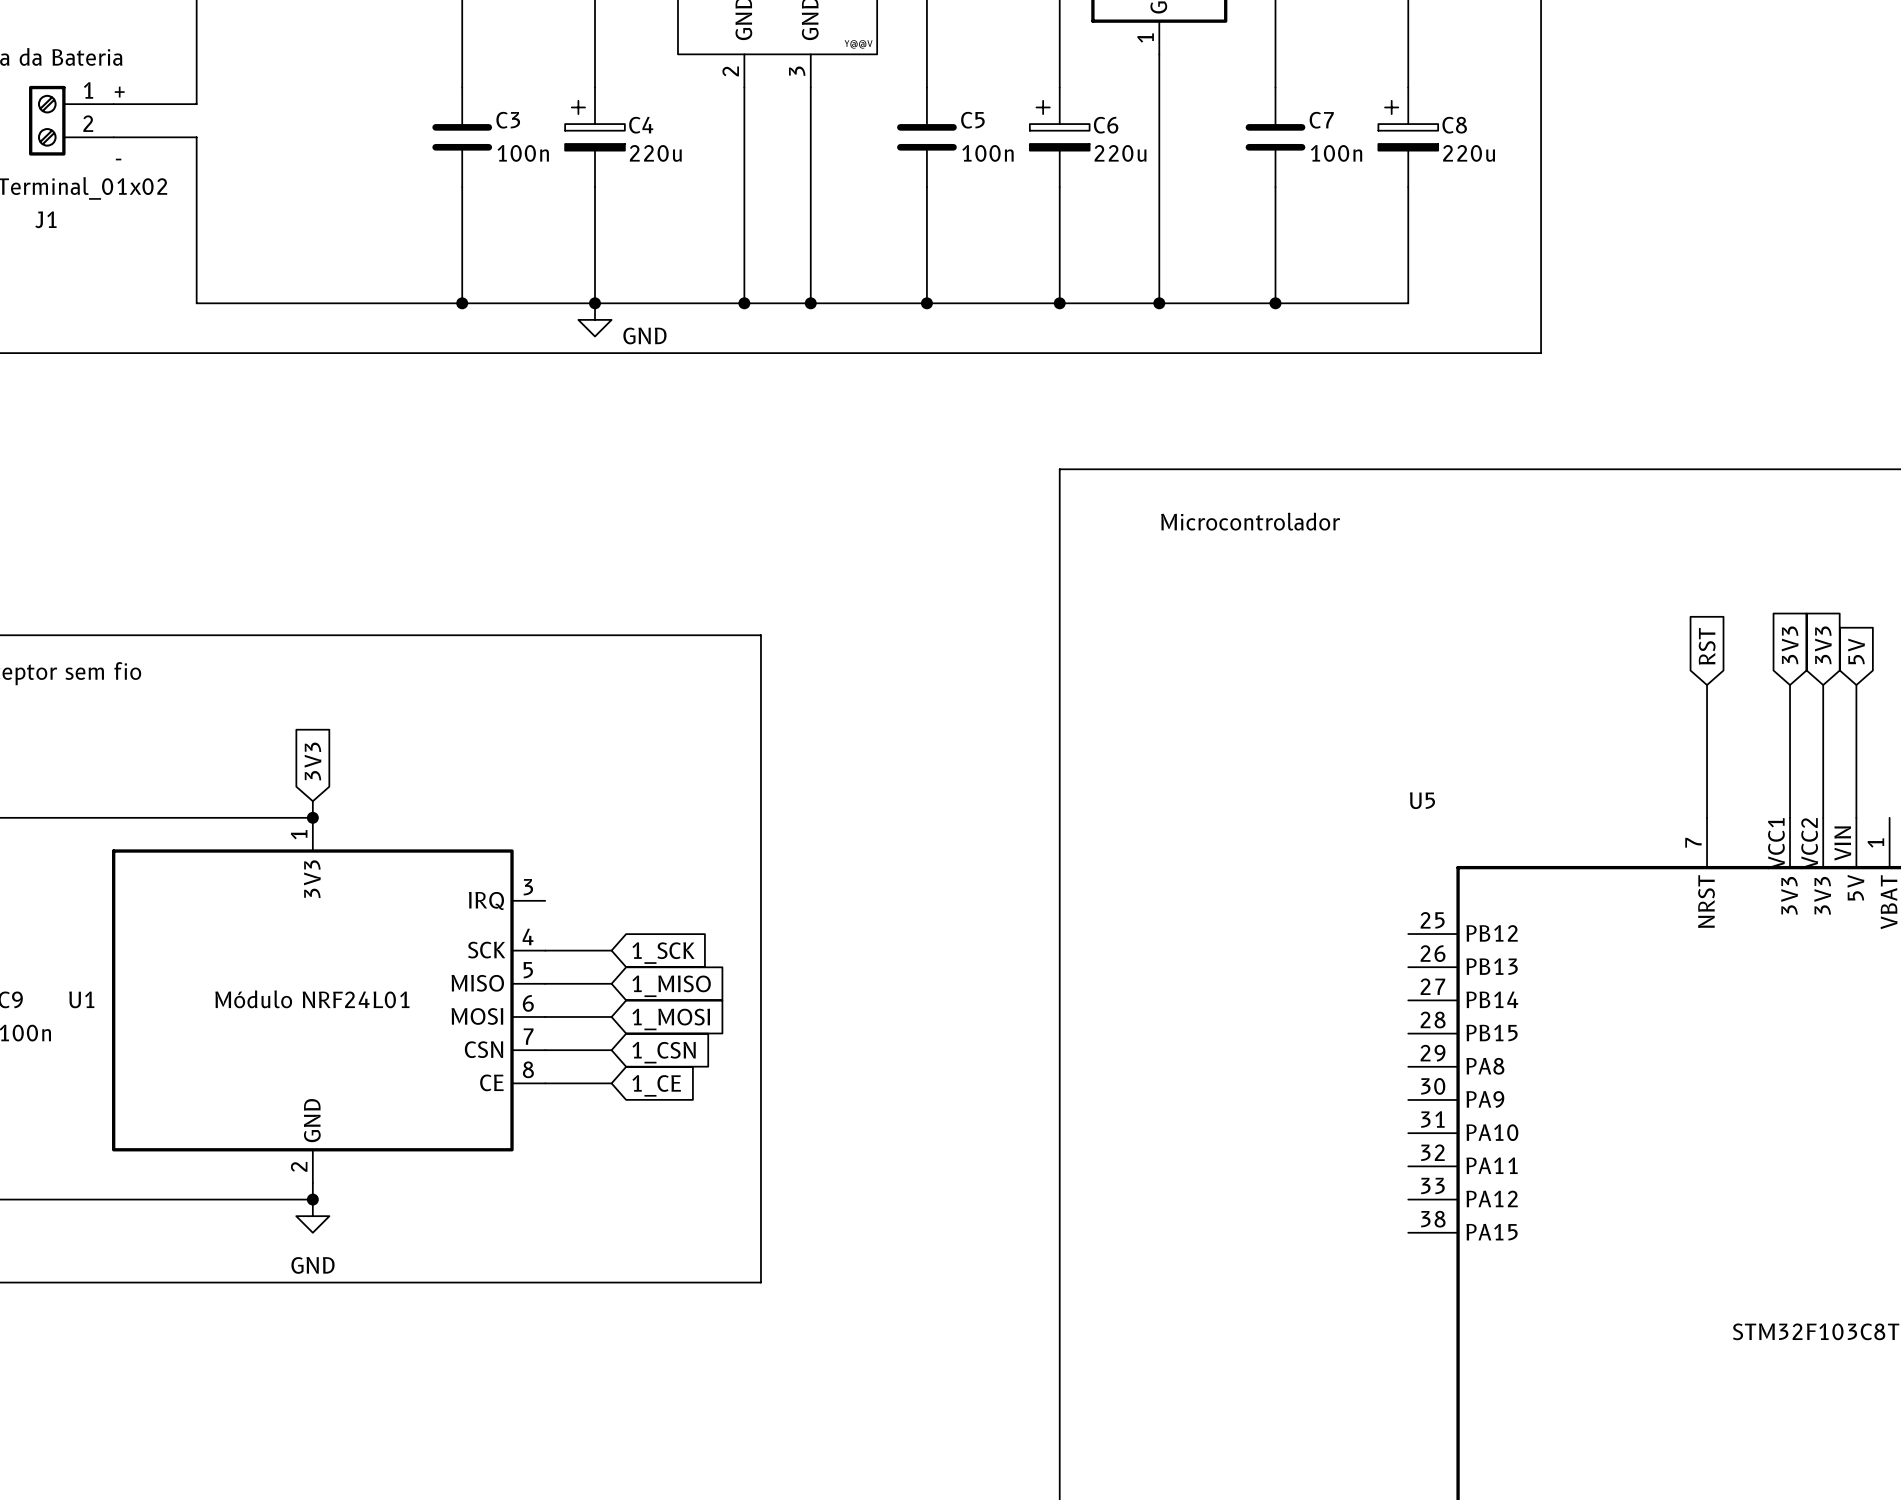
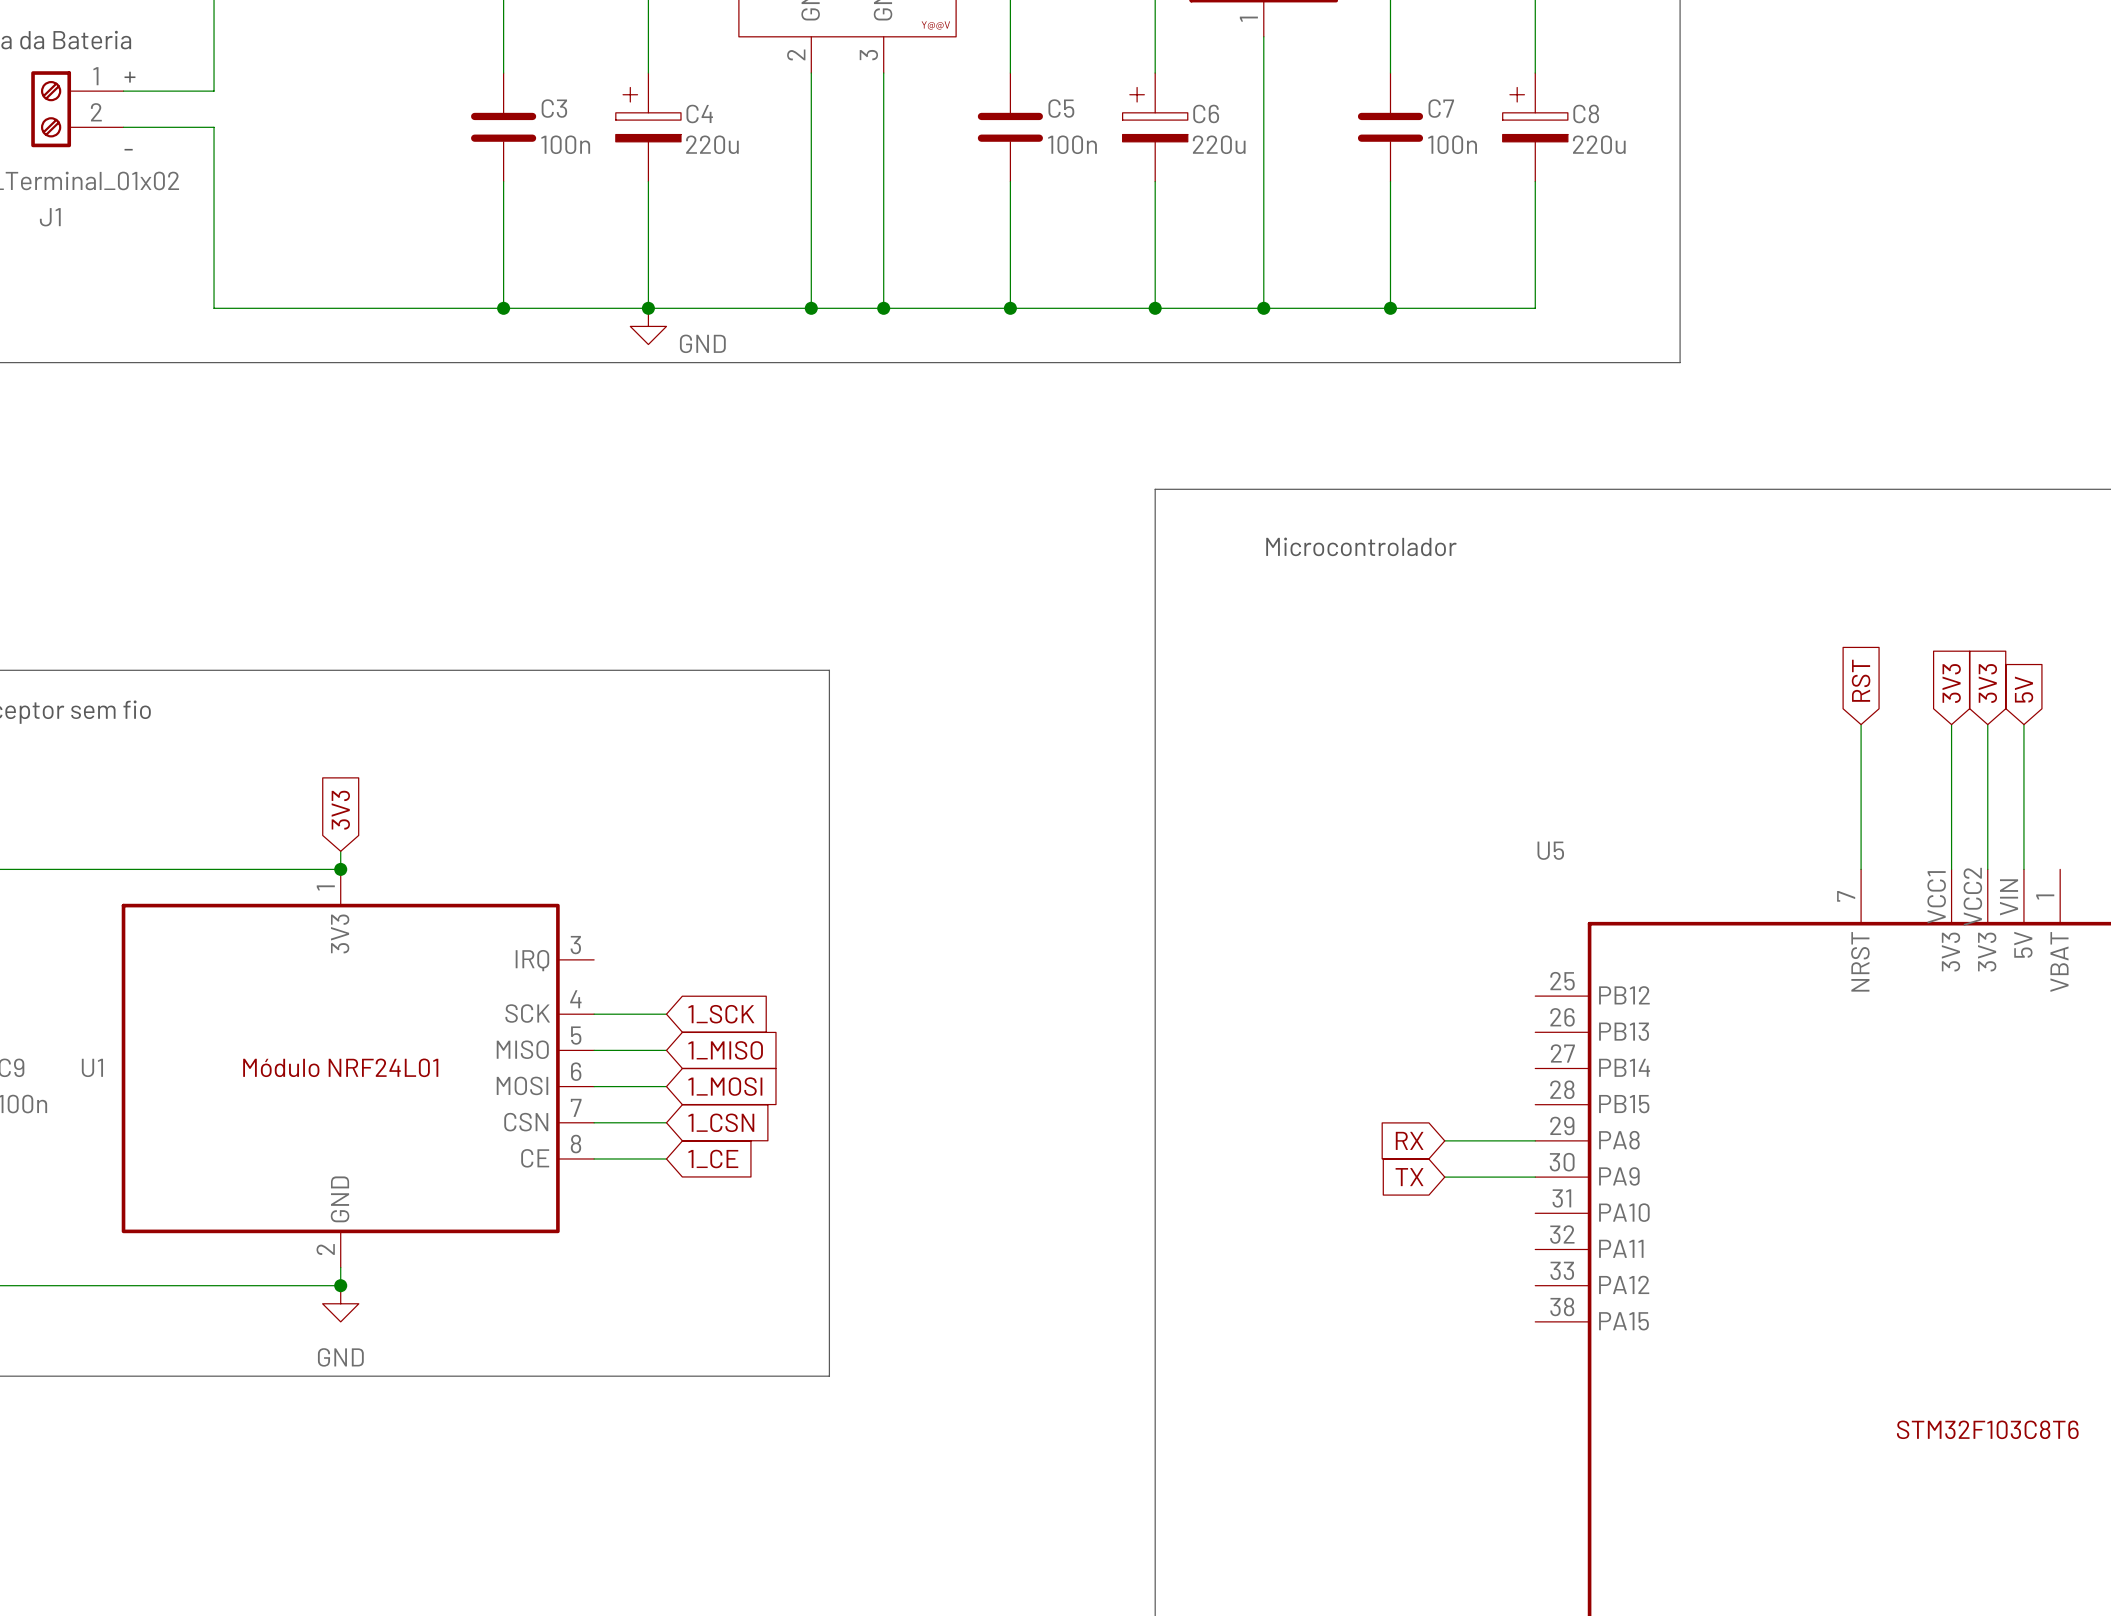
global label: none -> RX (1409, 1140)
wire: none -> (1444, 1140) (1535, 1140)
global label: none -> TX (1409, 1177)
wire: none -> (1444, 1177) (1535, 1177)

